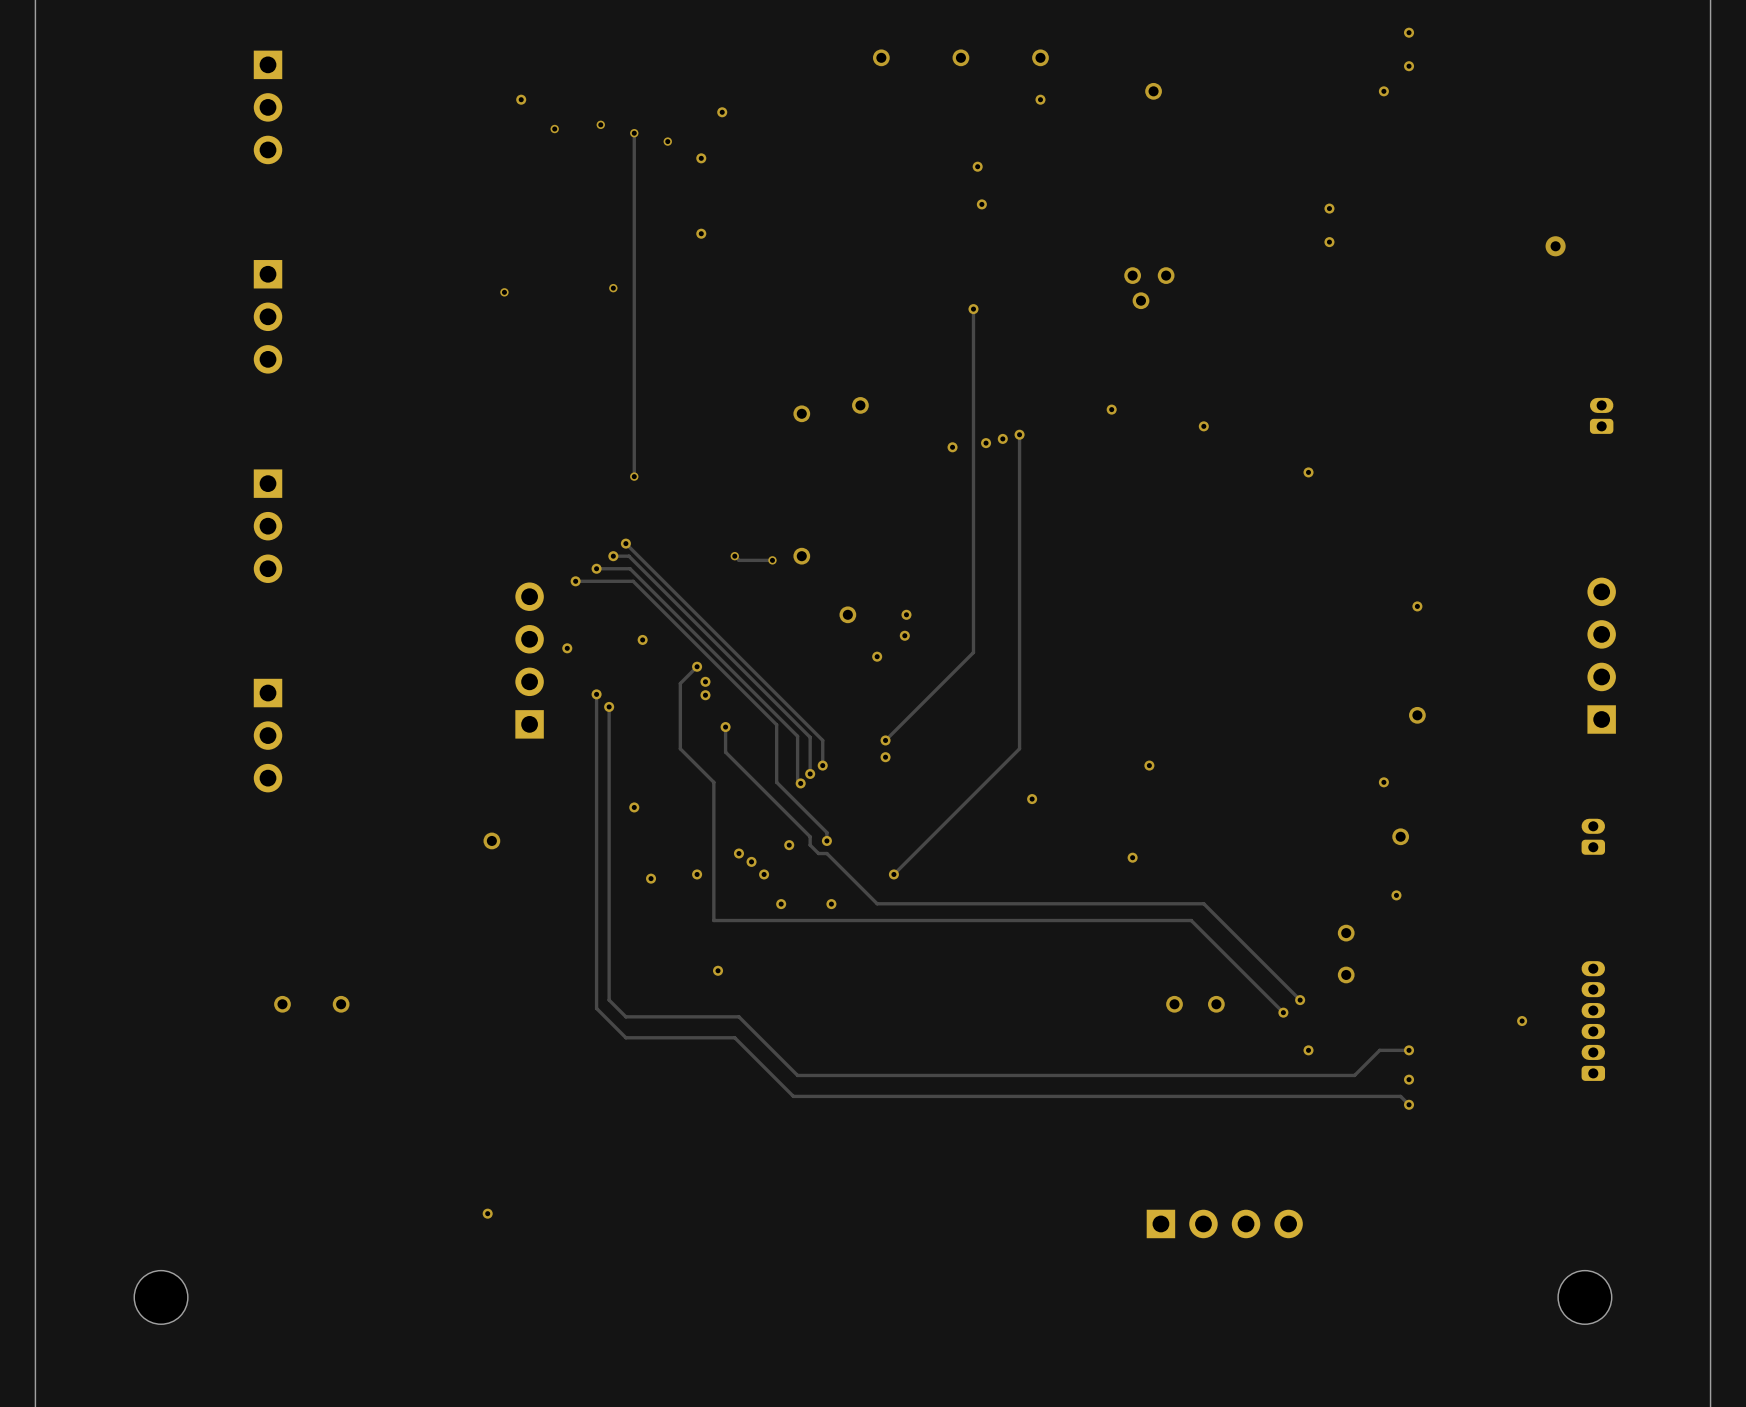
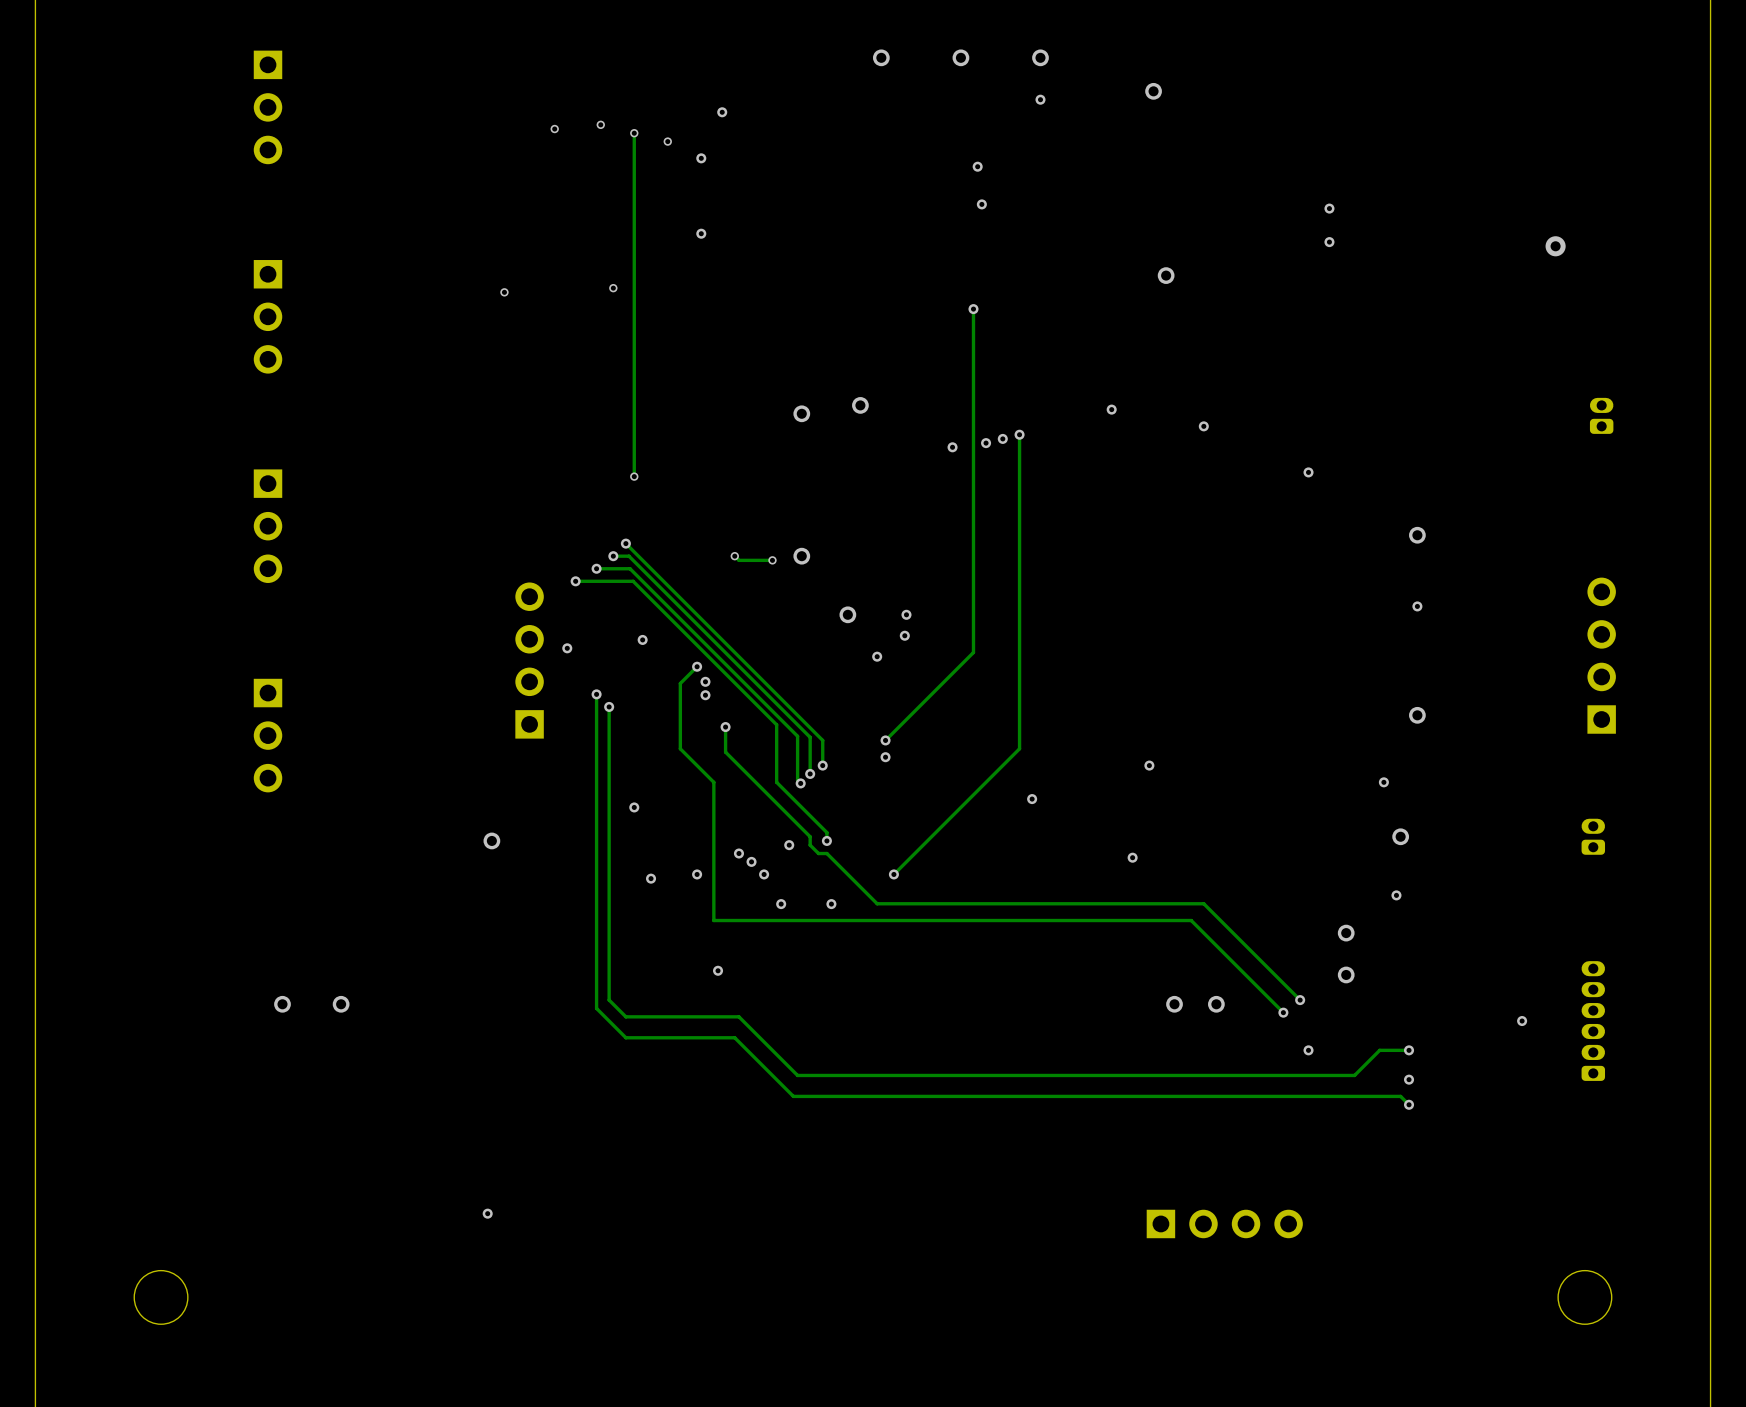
via: (1409, 32) -> none
via: (1409, 66) -> none
via: (1383, 91) -> none
via: (521, 99) -> none
via: (1132, 275) -> none
via: (1141, 300) -> none
via: none -> (1417, 535)

